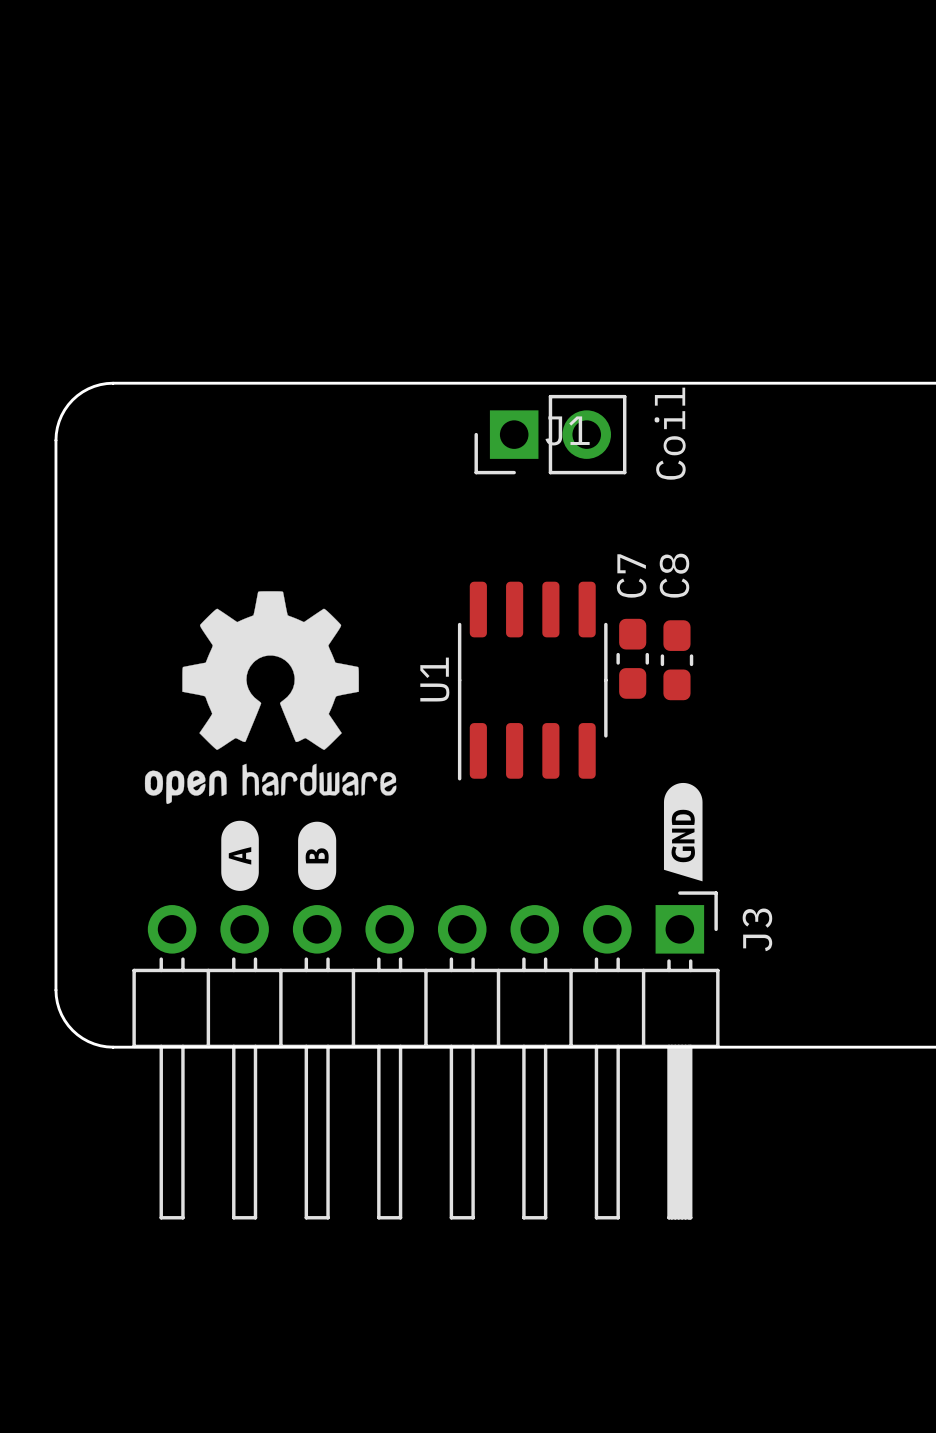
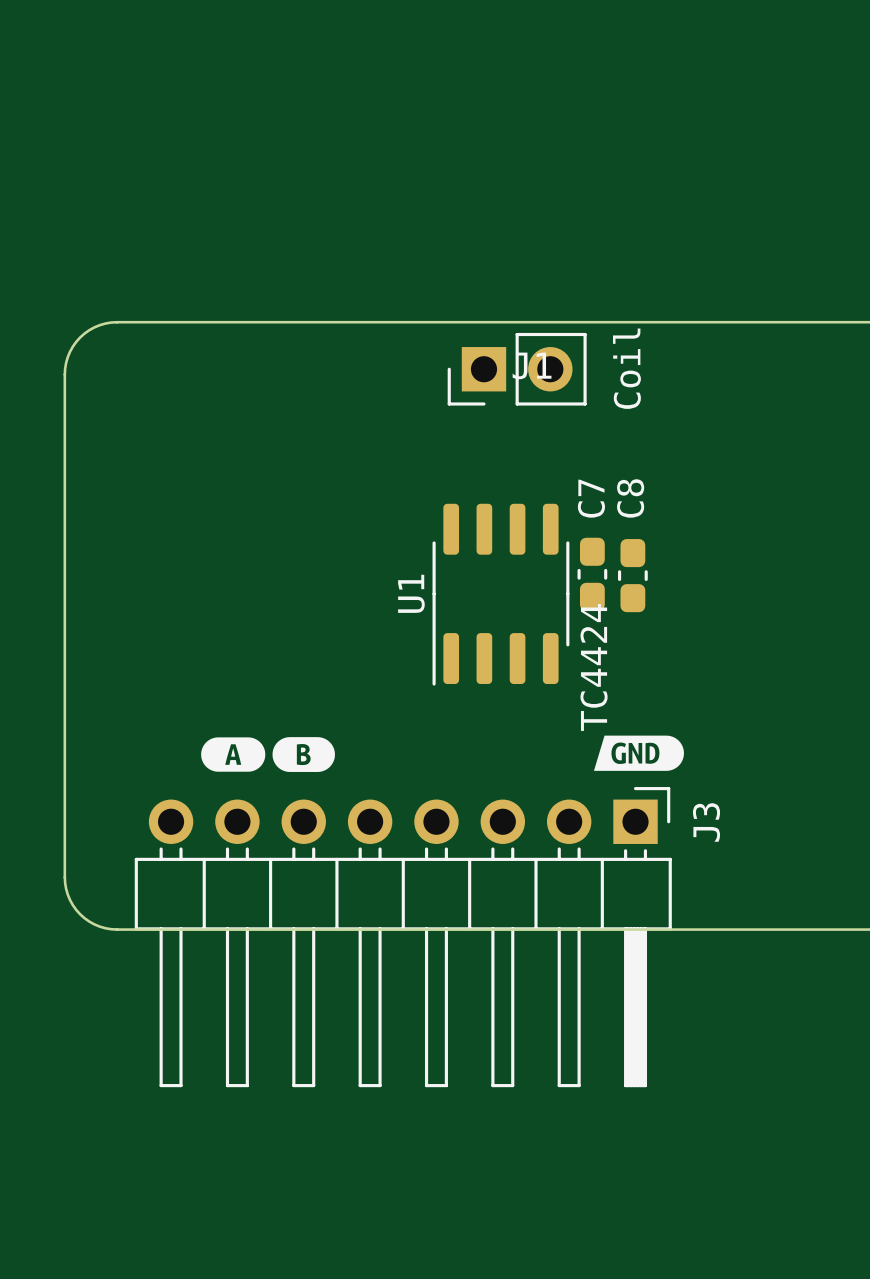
drawing: [144, 591, 397, 805] -> none
U1 value: none -> TC4424 (594, 667)
drawing shape: [663, 782, 703, 882] -> [593, 735, 684, 771]
drawing shape: [221, 820, 259, 891] -> [201, 737, 266, 772]
drawing shape: [298, 821, 337, 890] -> [272, 737, 335, 772]

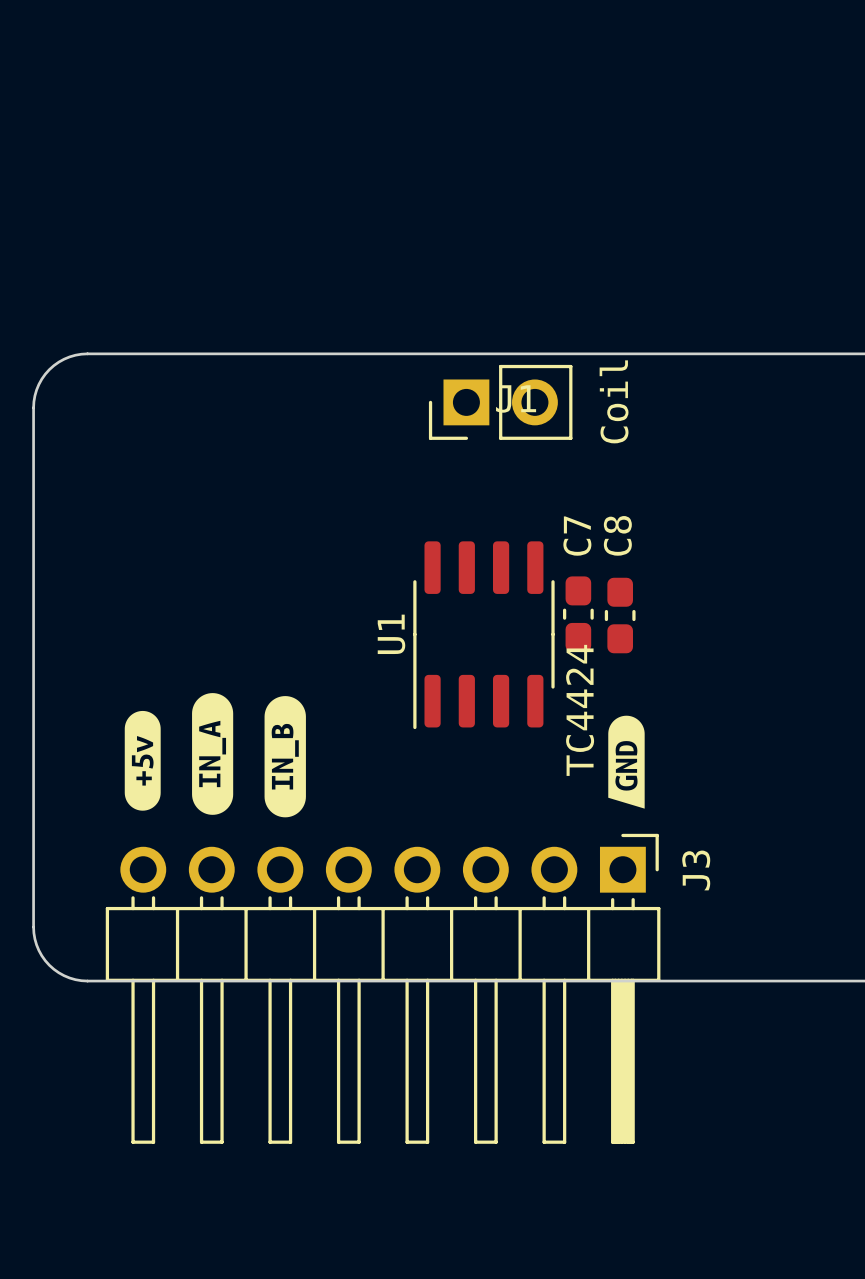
drawing: none -> [124, 693, 306, 818]
drawing: none -> [608, 715, 645, 809]
drawing: [593, 735, 684, 771] -> none
drawing: [201, 737, 335, 772] -> none

